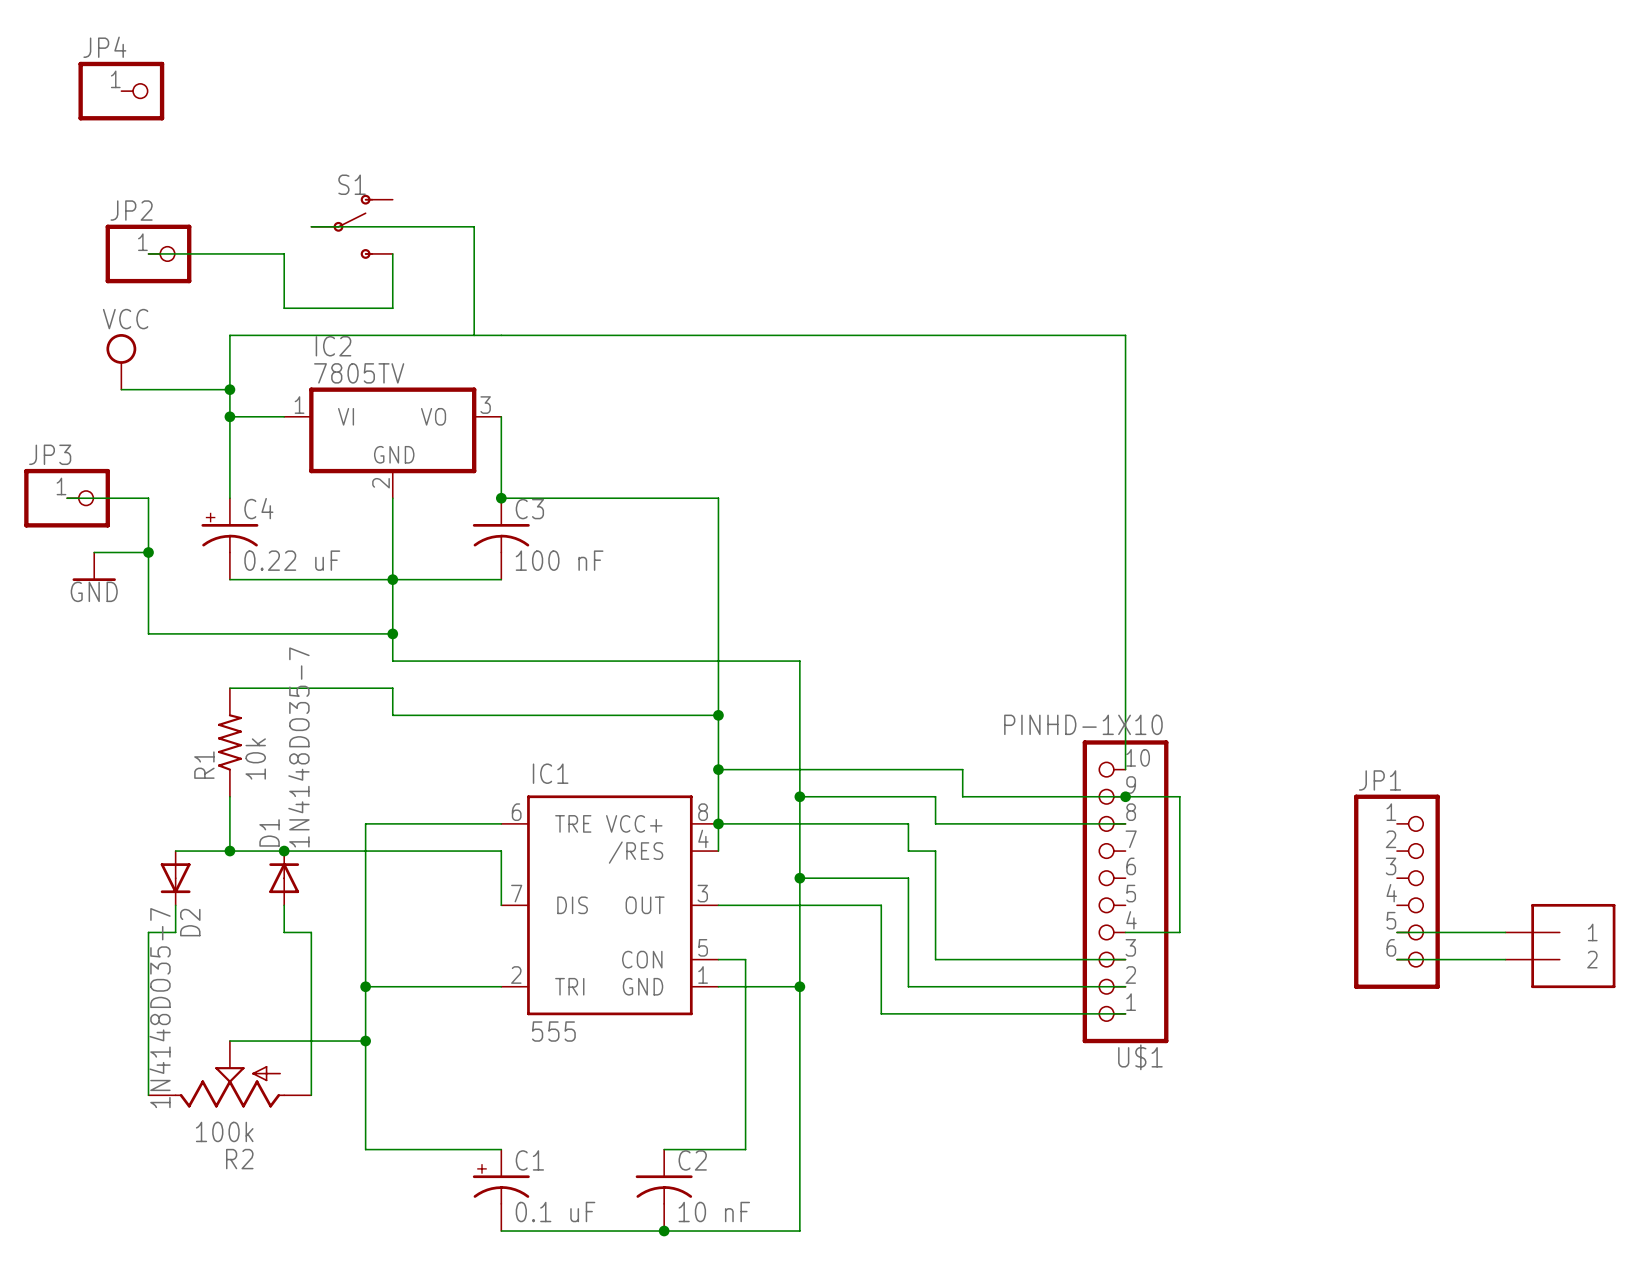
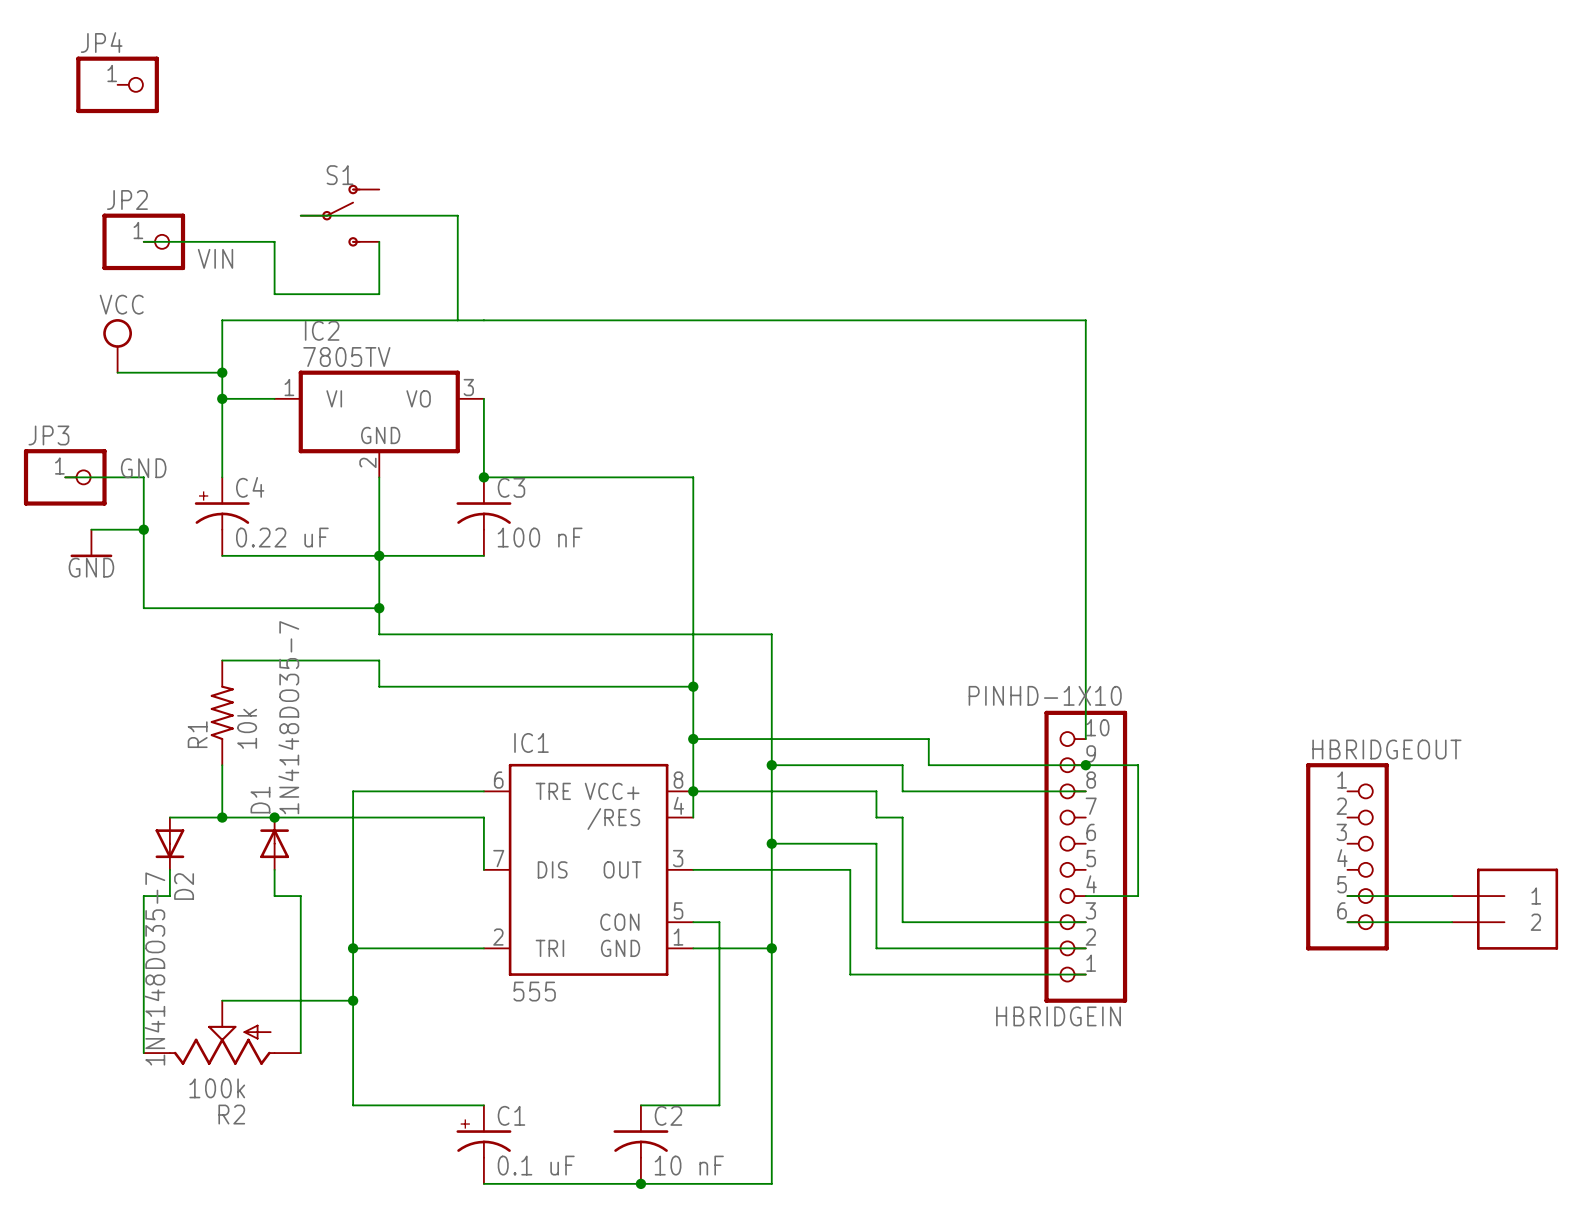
label: none -> VIN (215, 258)
label: none -> GND (143, 468)
JP1 name: JP1 (1380, 780) -> HBRIDGEOUT (1386, 749)
U$1 name: U$1 (1140, 1057) -> HBRIDGEIN (1058, 1016)

